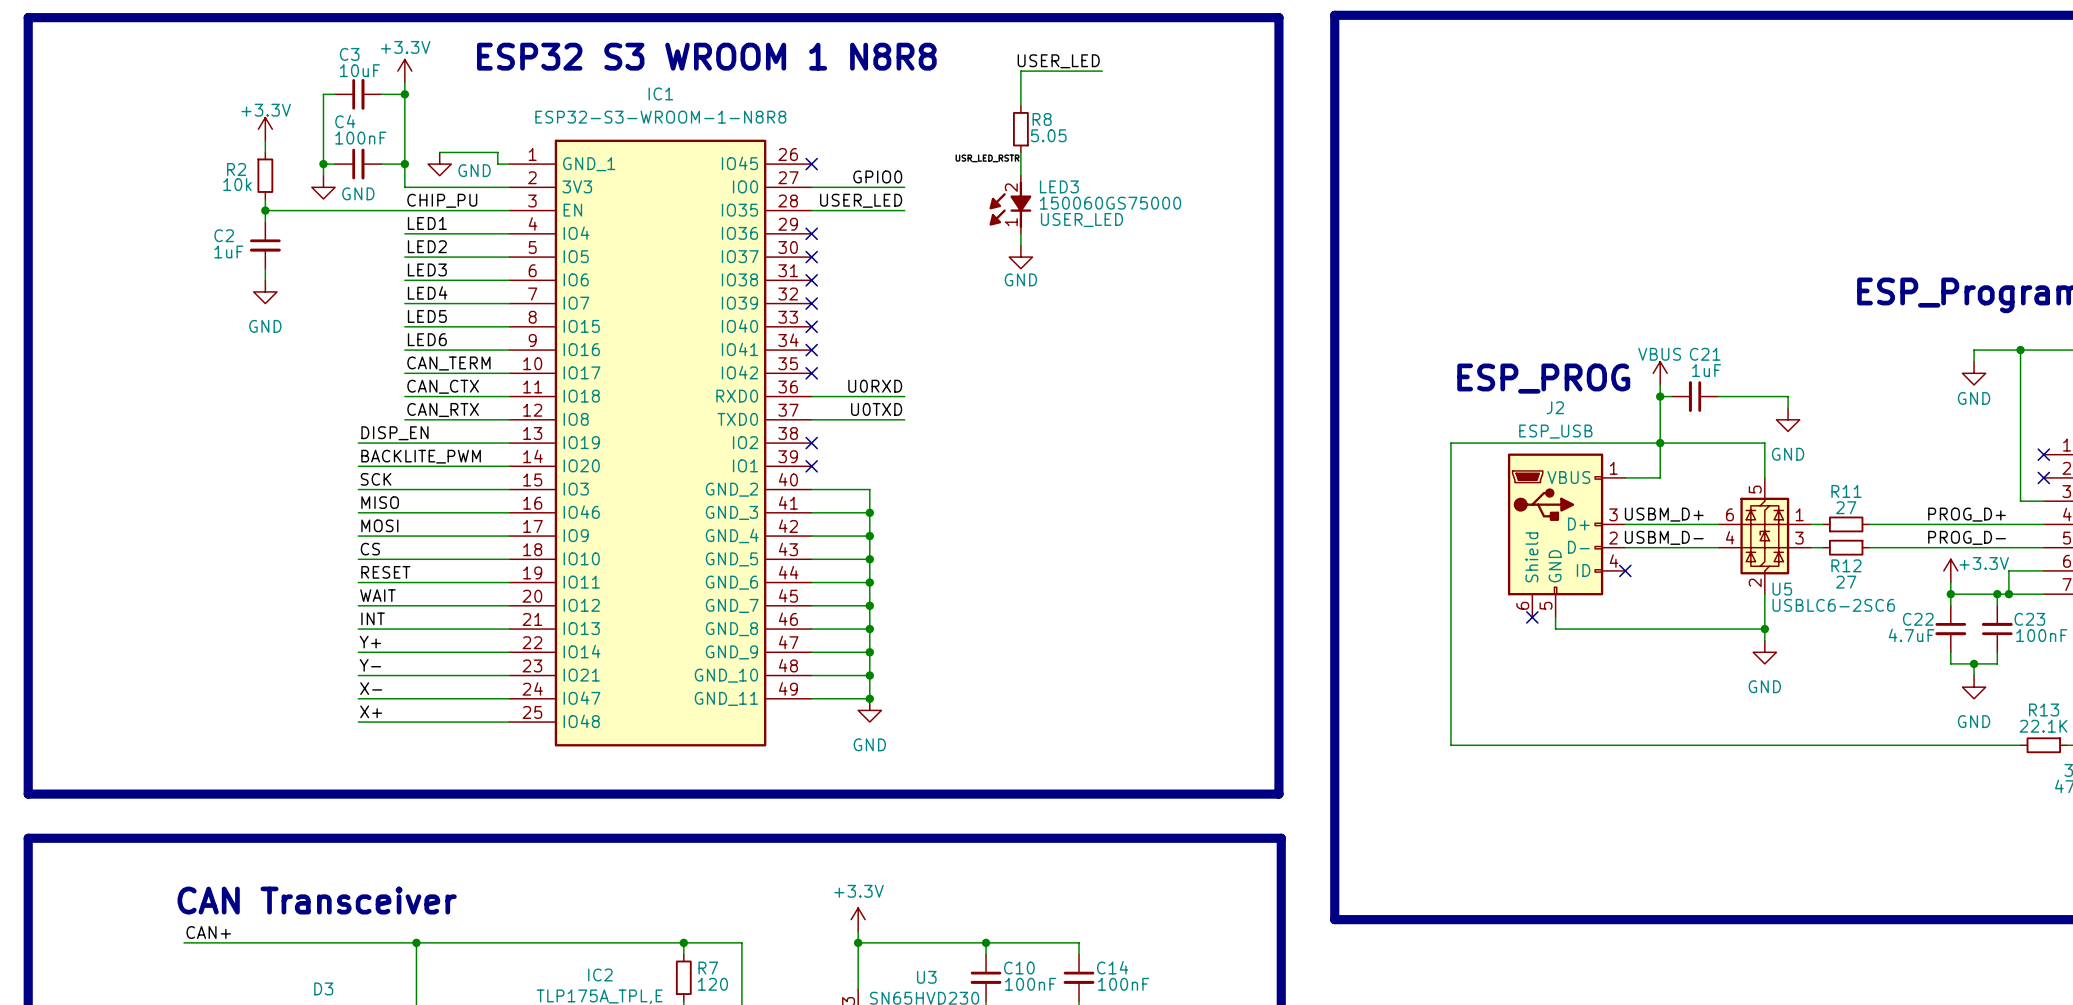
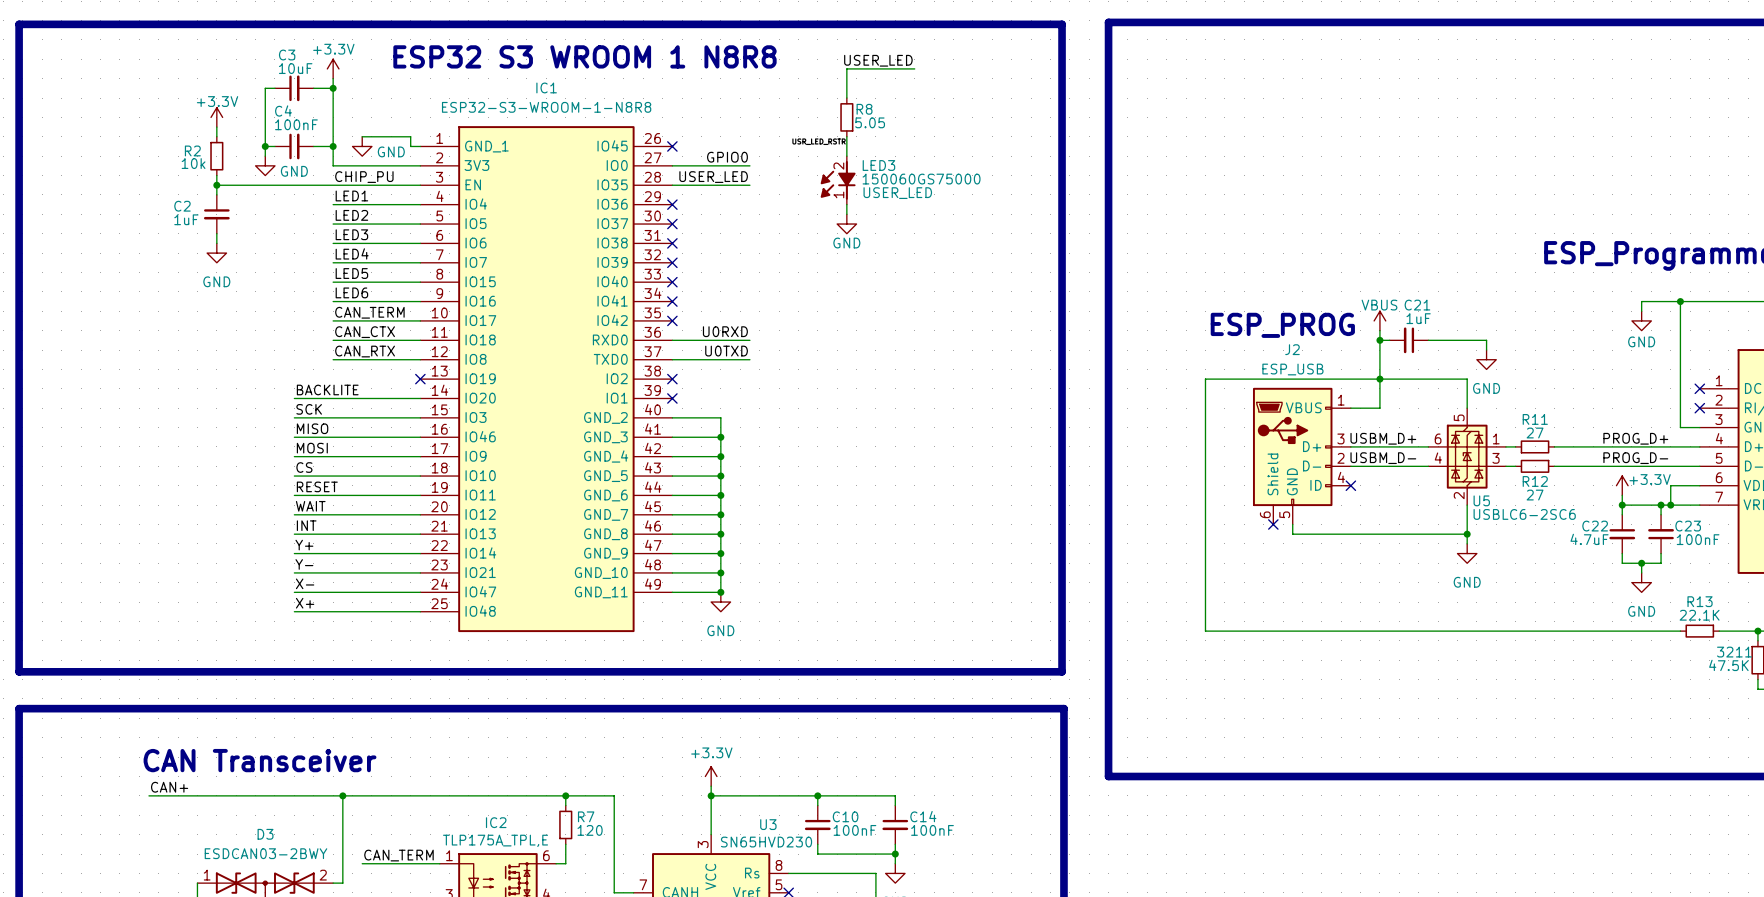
label: DISP_EN (394, 433) -> none
wire: (358, 443) (509, 443) -> none
no-connect mark: none -> (420, 379)
label: BACKLITE_PWM (421, 456) -> BACKLITE (327, 389)

